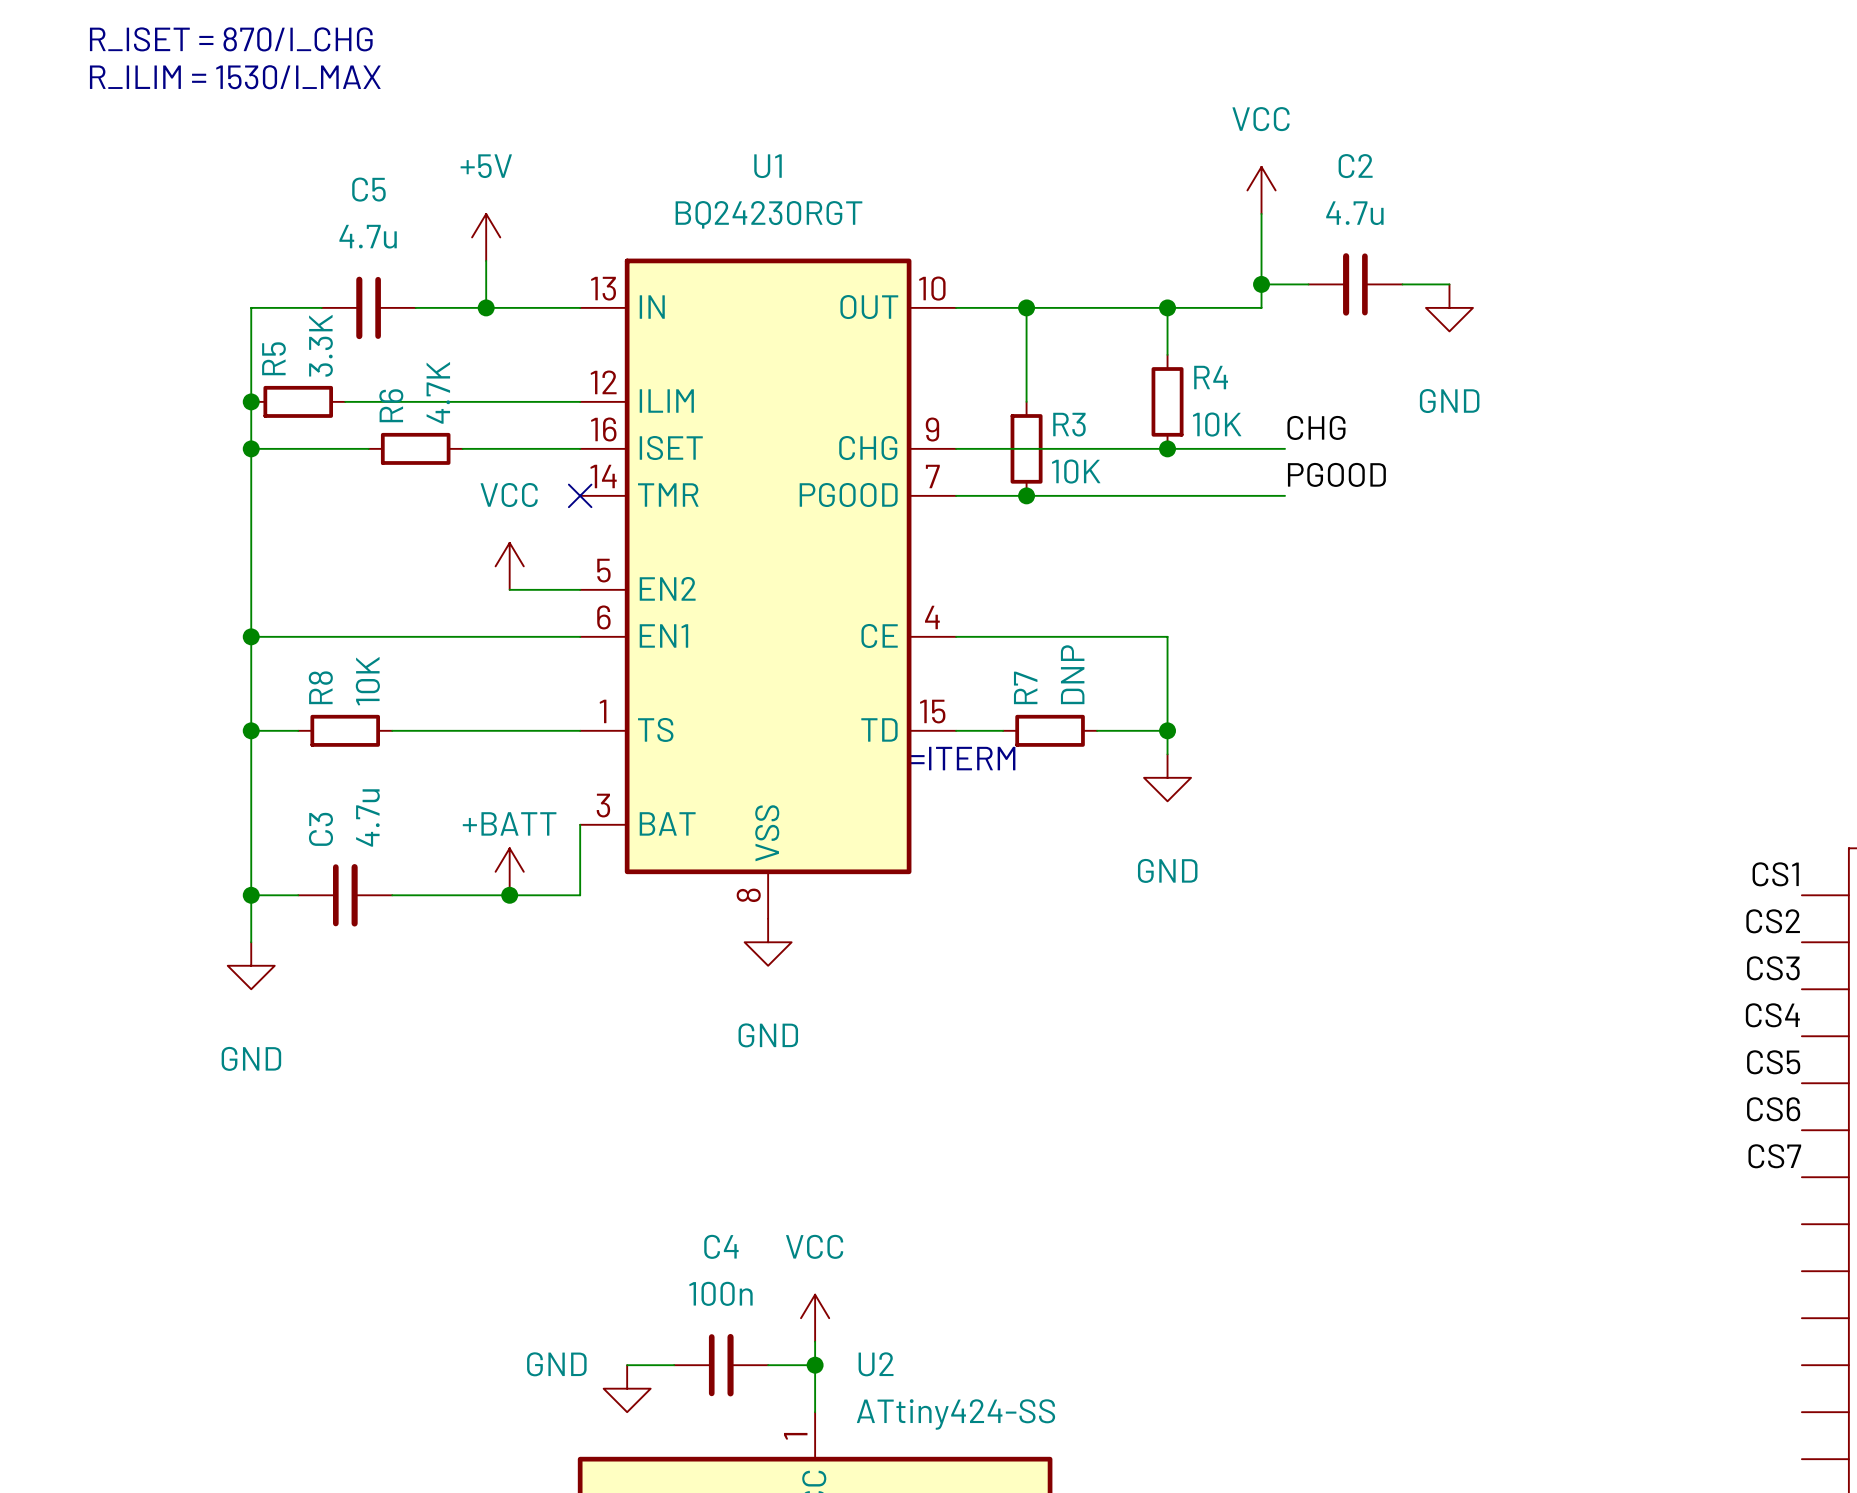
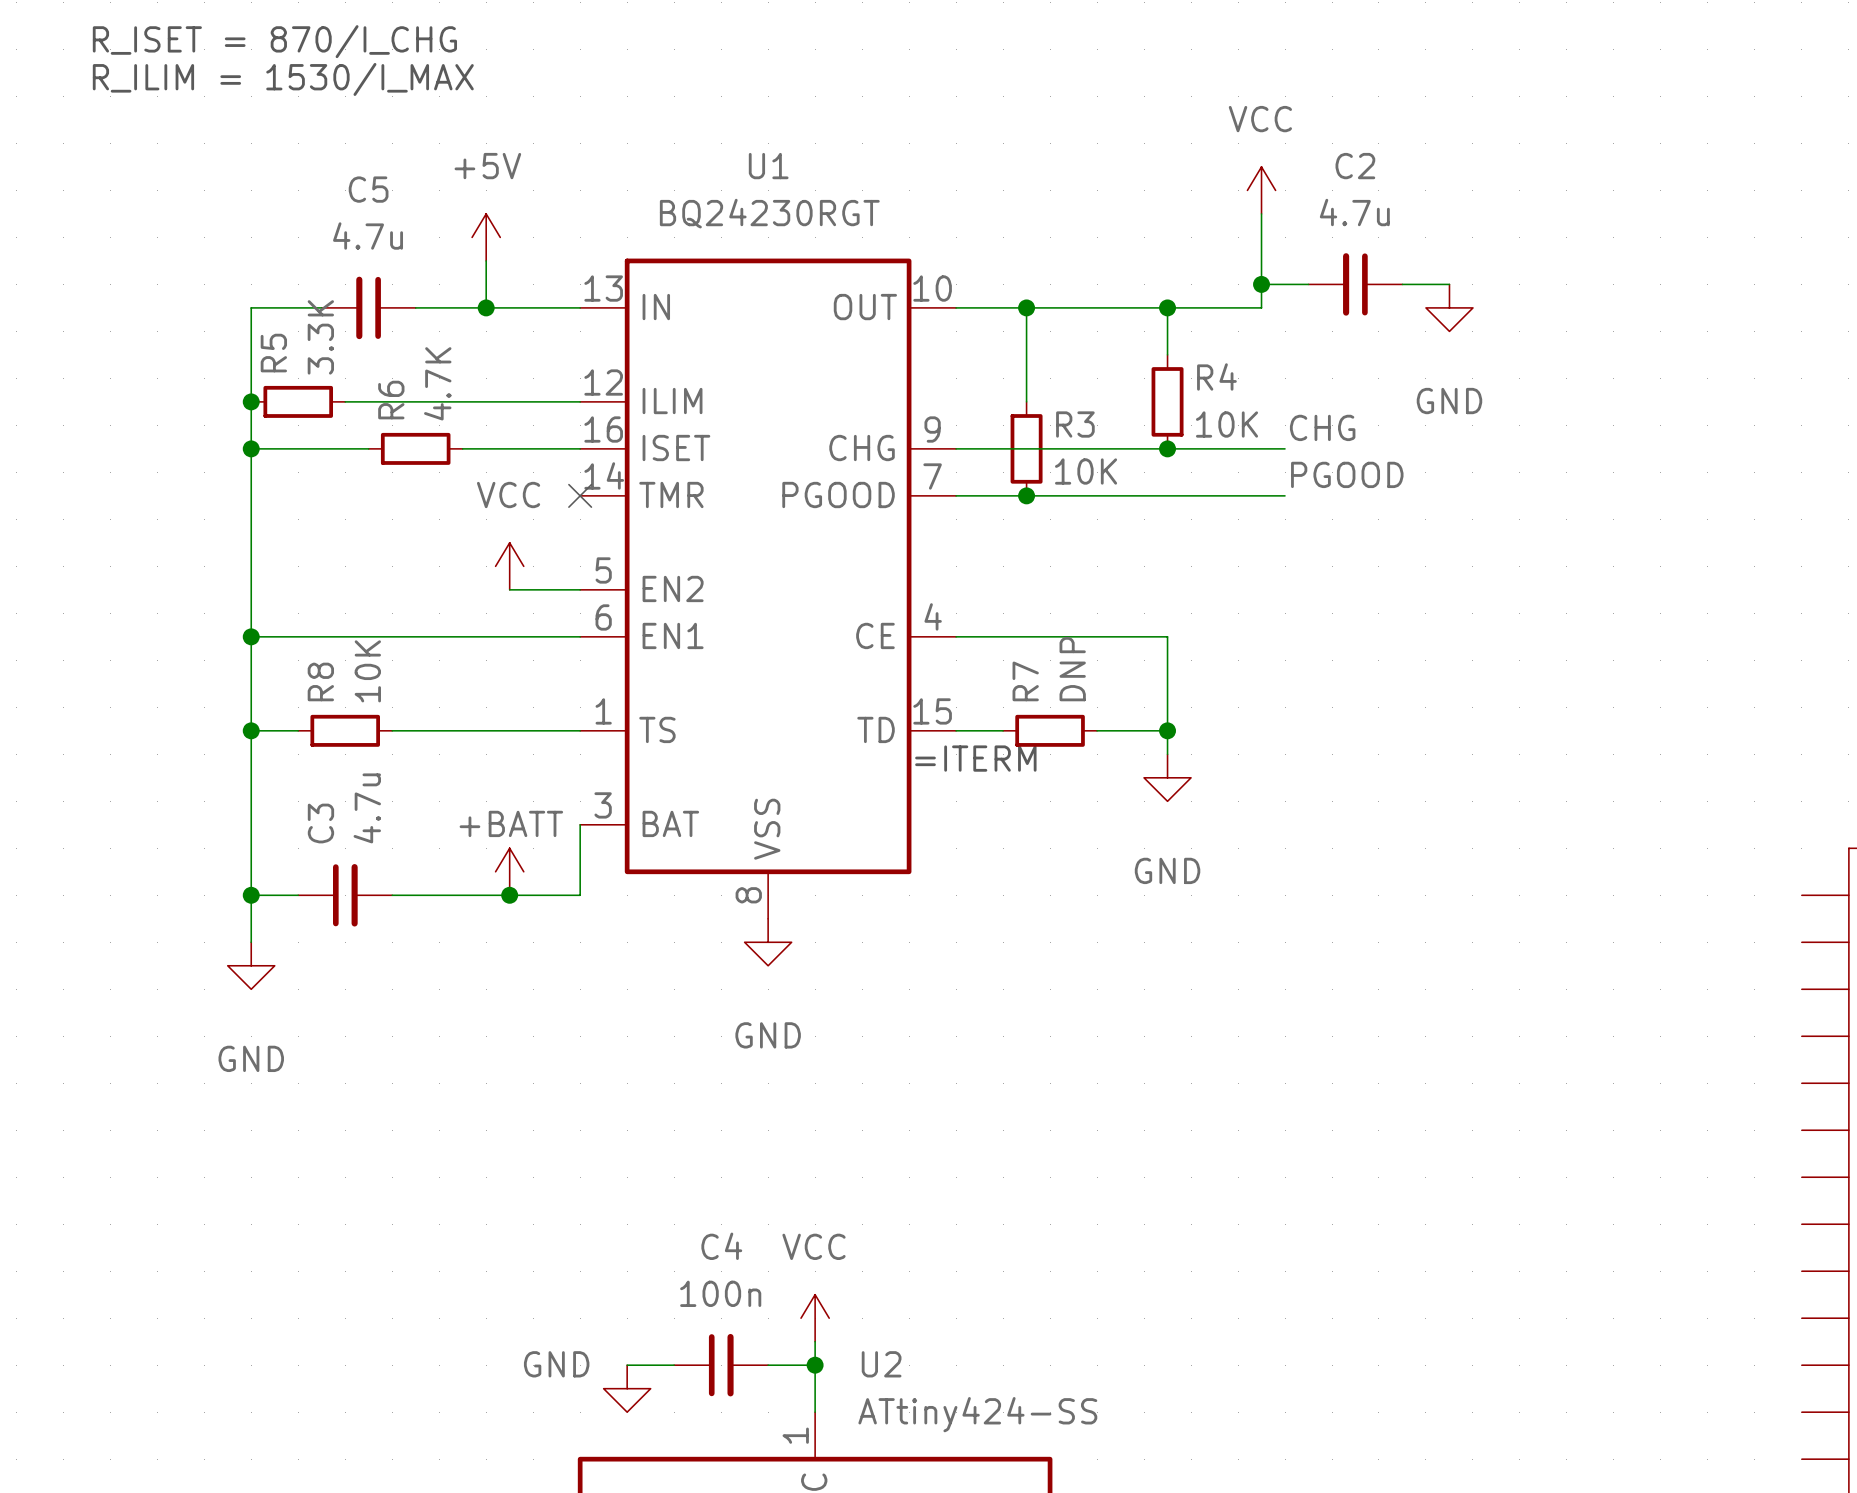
label: CS1 (1775, 874) -> none
label: CS2 (1773, 921) -> none
label: CS3 (1773, 968) -> none
label: CS4 (1772, 1015) -> none
label: CS5 (1773, 1062) -> none
label: CS6 (1773, 1109) -> none
label: CS7 (1774, 1156) -> none

